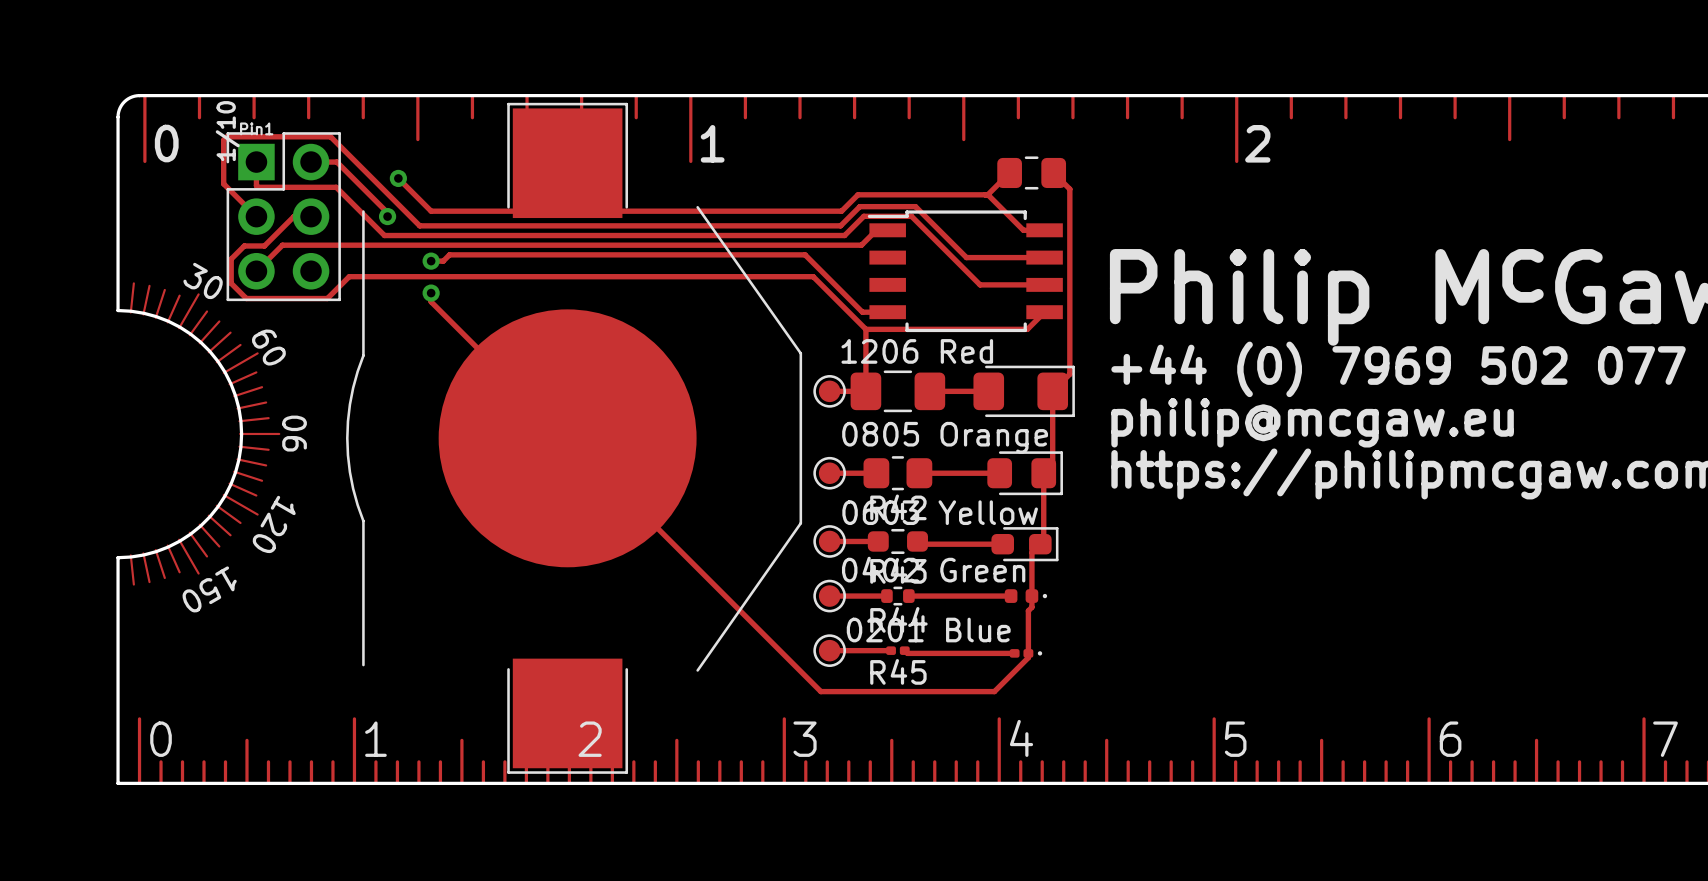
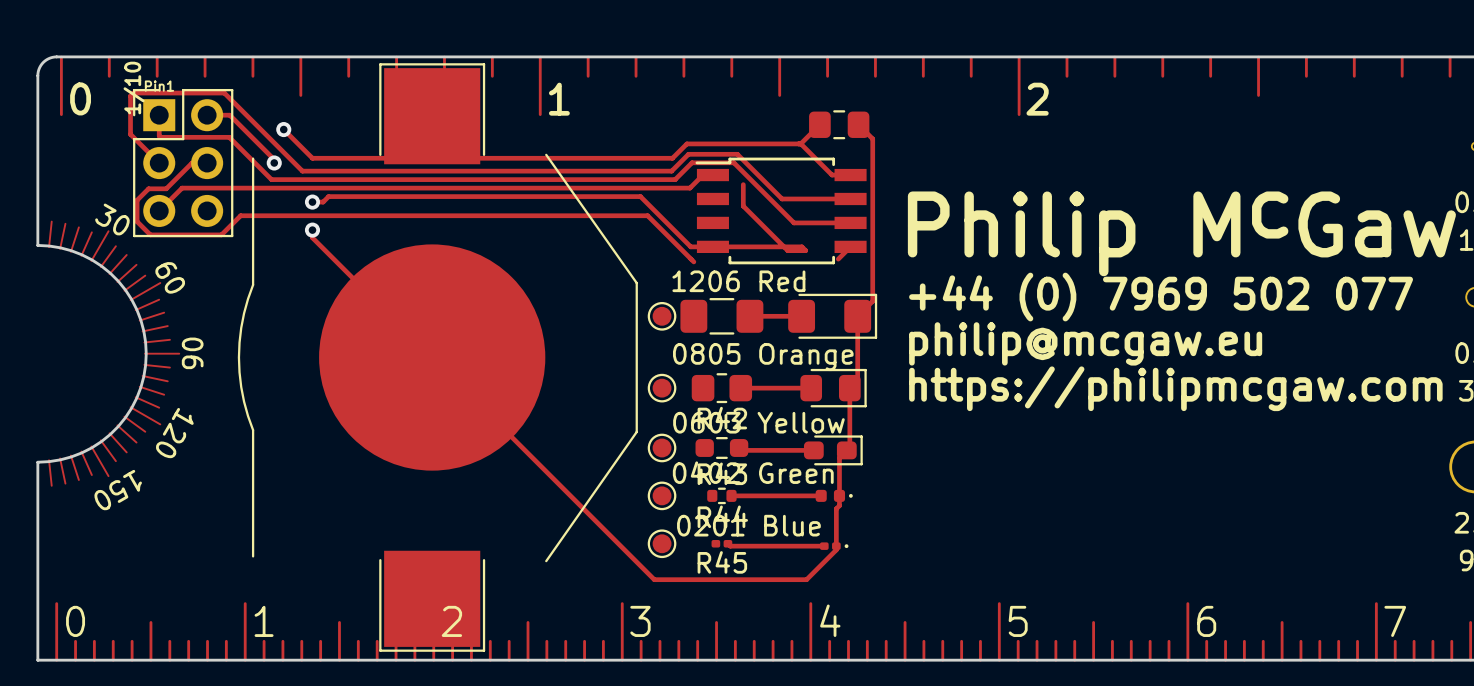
track: none -> (743, 184) (743, 206) (787, 250) (805, 250) (801, 246) (712, 246)
track: (1030, 326) (1027, 329) (865, 329) (865, 391) (829, 391) -> none
track: (829, 473) (876, 473) -> none
track: (829, 541) (878, 541) -> none
track: (829, 596) (886, 596) -> none
track: (829, 650) (891, 650) -> none

